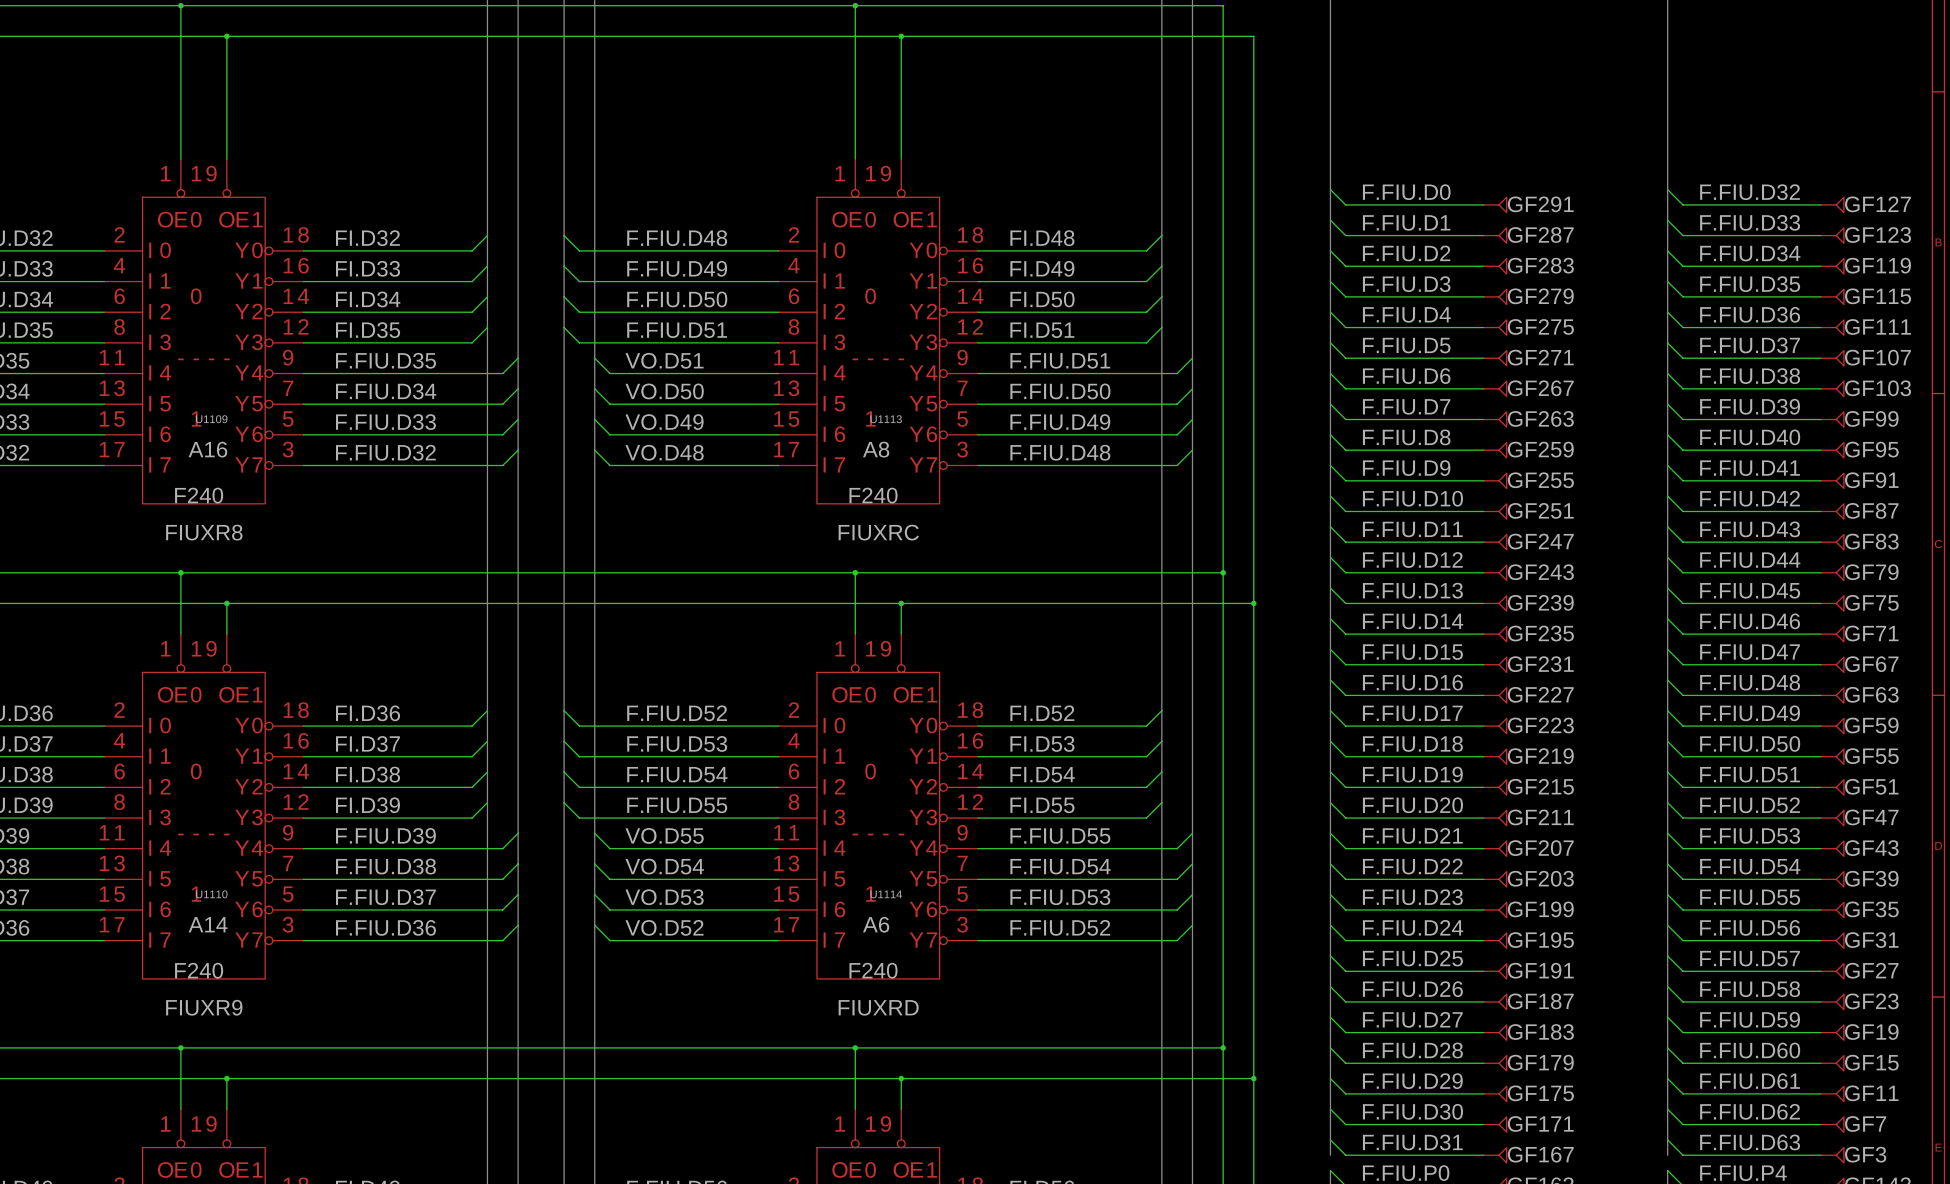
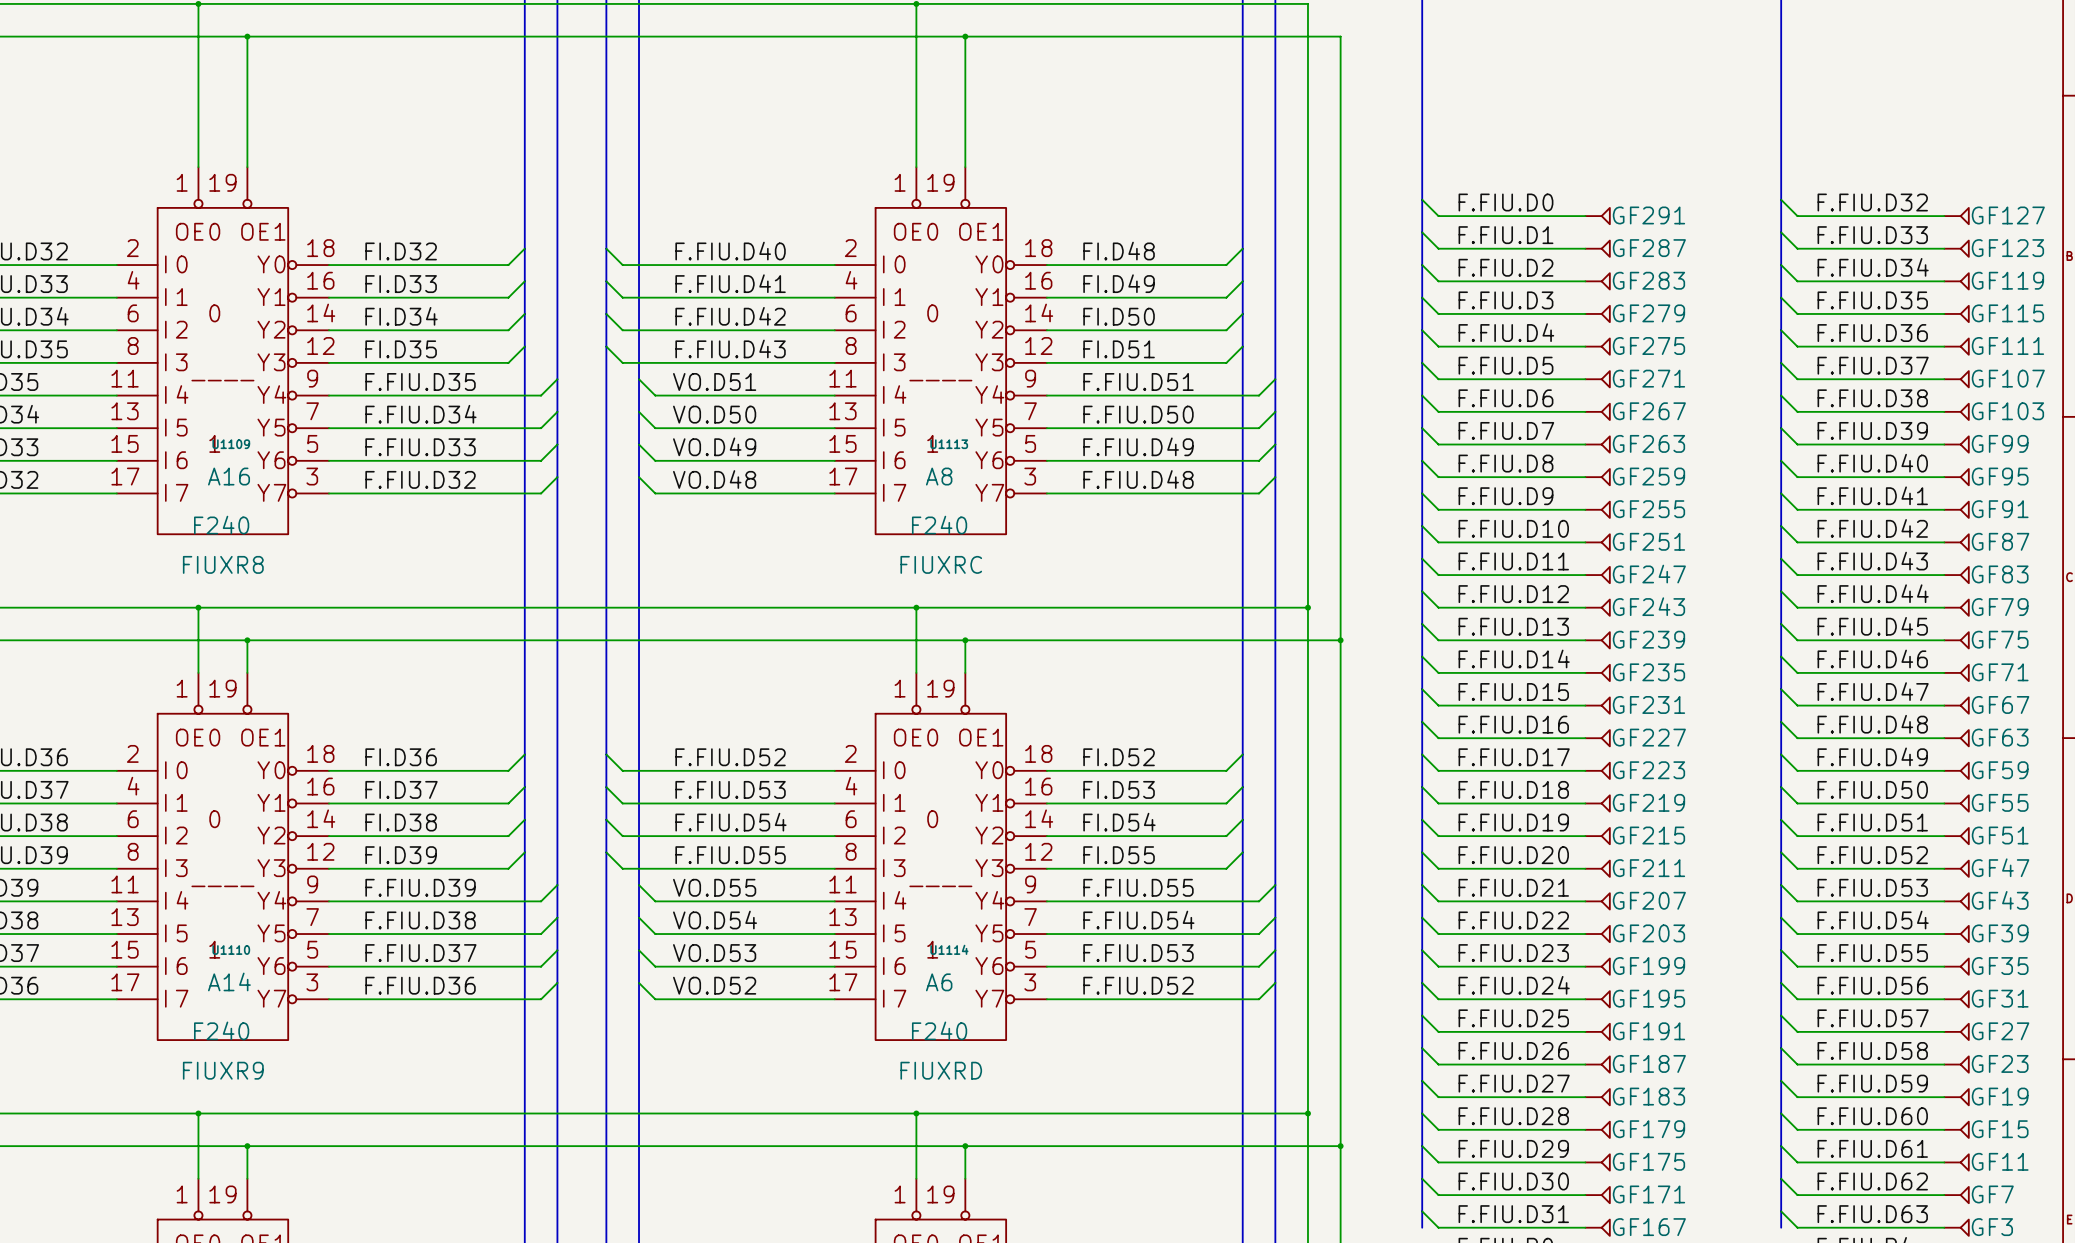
label: F.FIU.D48 (677, 238) -> F.FIU.D40 (730, 251)
label: F.FIU.D49 (677, 268) -> F.FIU.D41 (730, 283)
label: F.FIU.D50 (677, 299) -> F.FIU.D42 (730, 316)
label: F.FIU.D51 (677, 330) -> F.FIU.D43 (730, 348)

